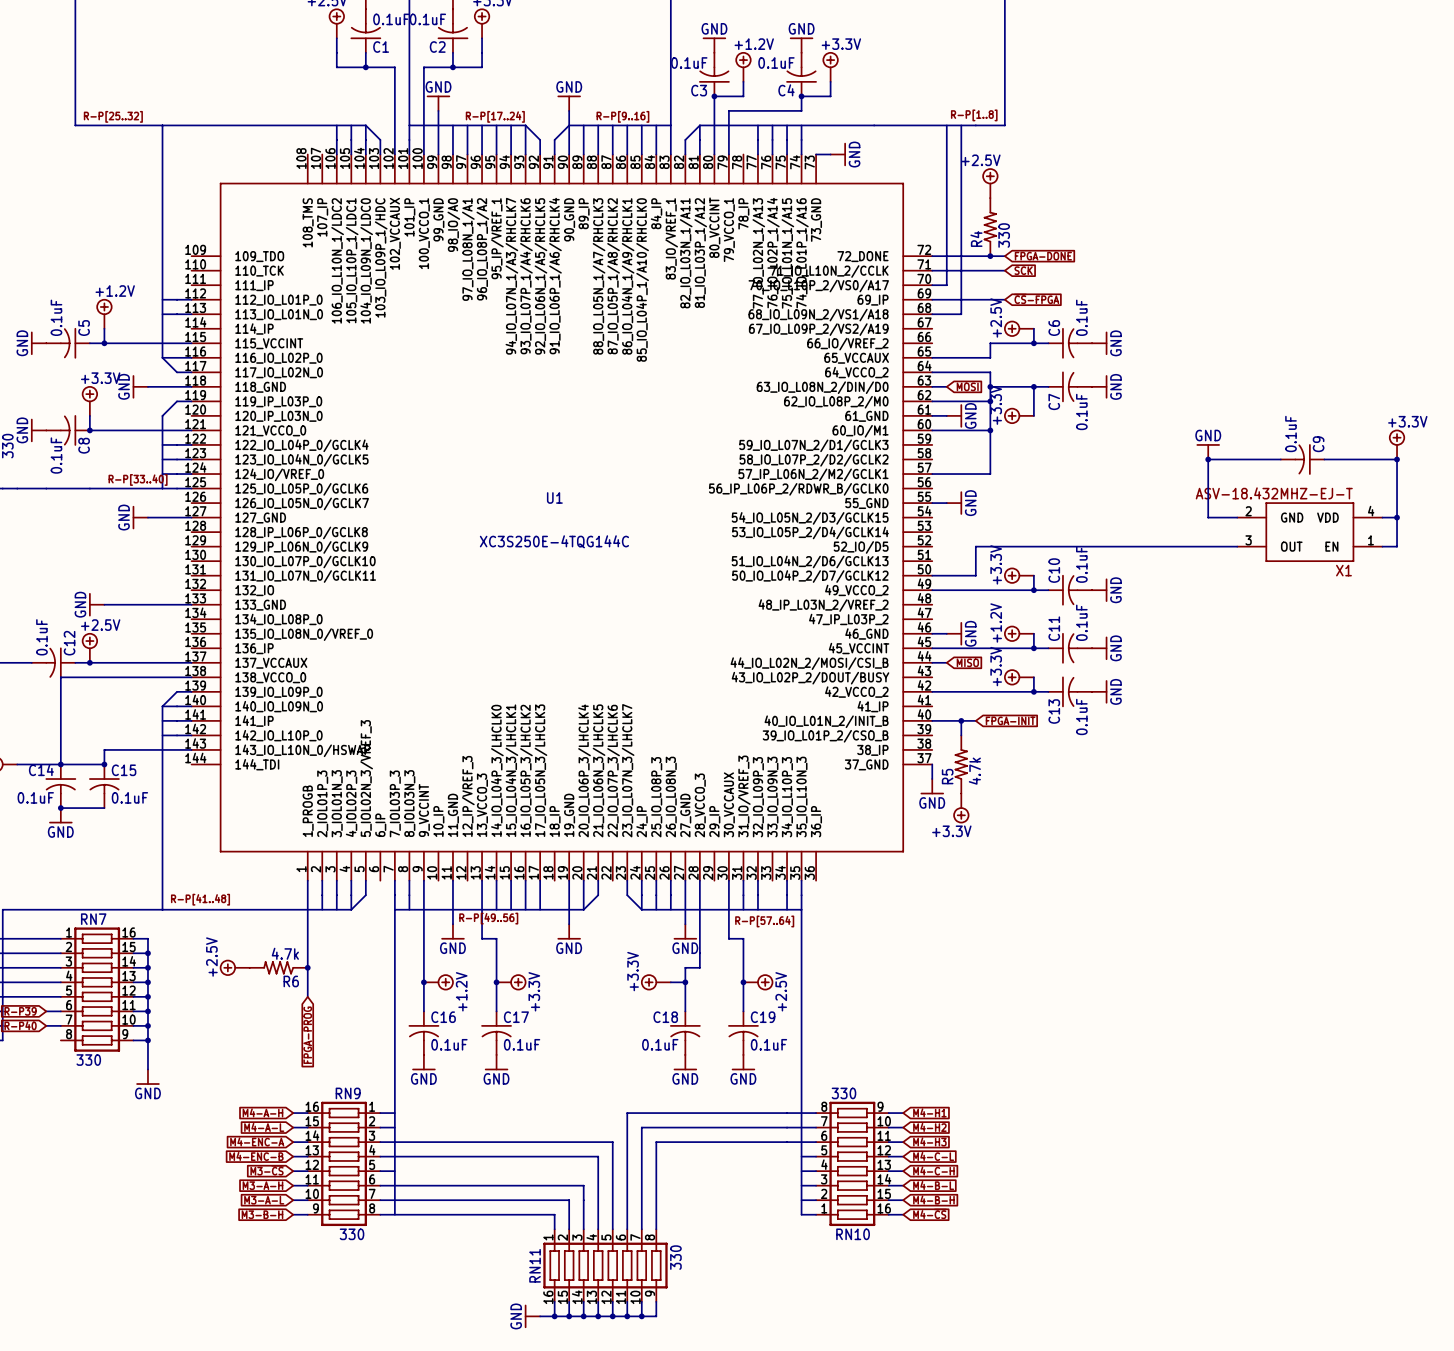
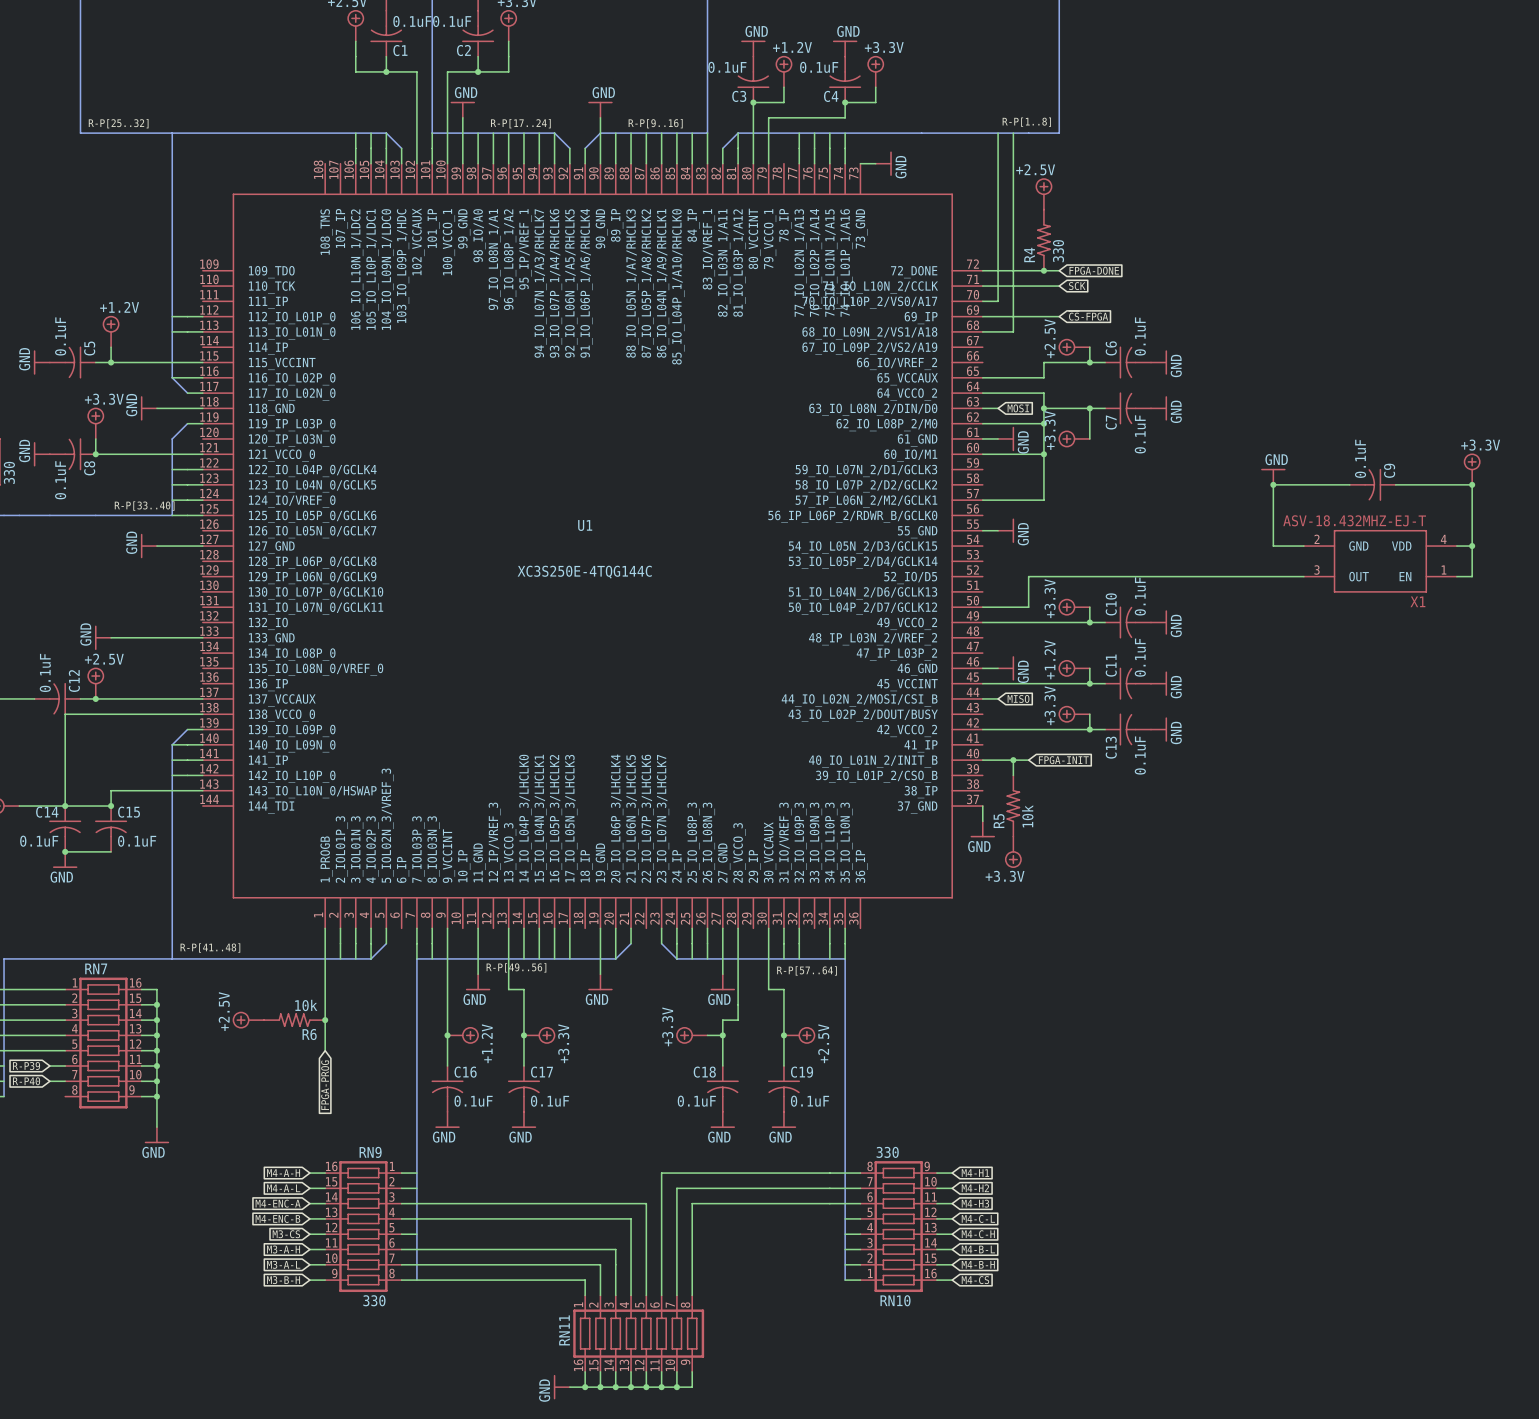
R5 value: 4.7k (974, 771) -> 10k (1027, 816)
R6 value: 4.7k (285, 953) -> 10k (306, 1005)
RN7 value: 330 (88, 1060) -> none
RN11 value: 330 (675, 1257) -> none

